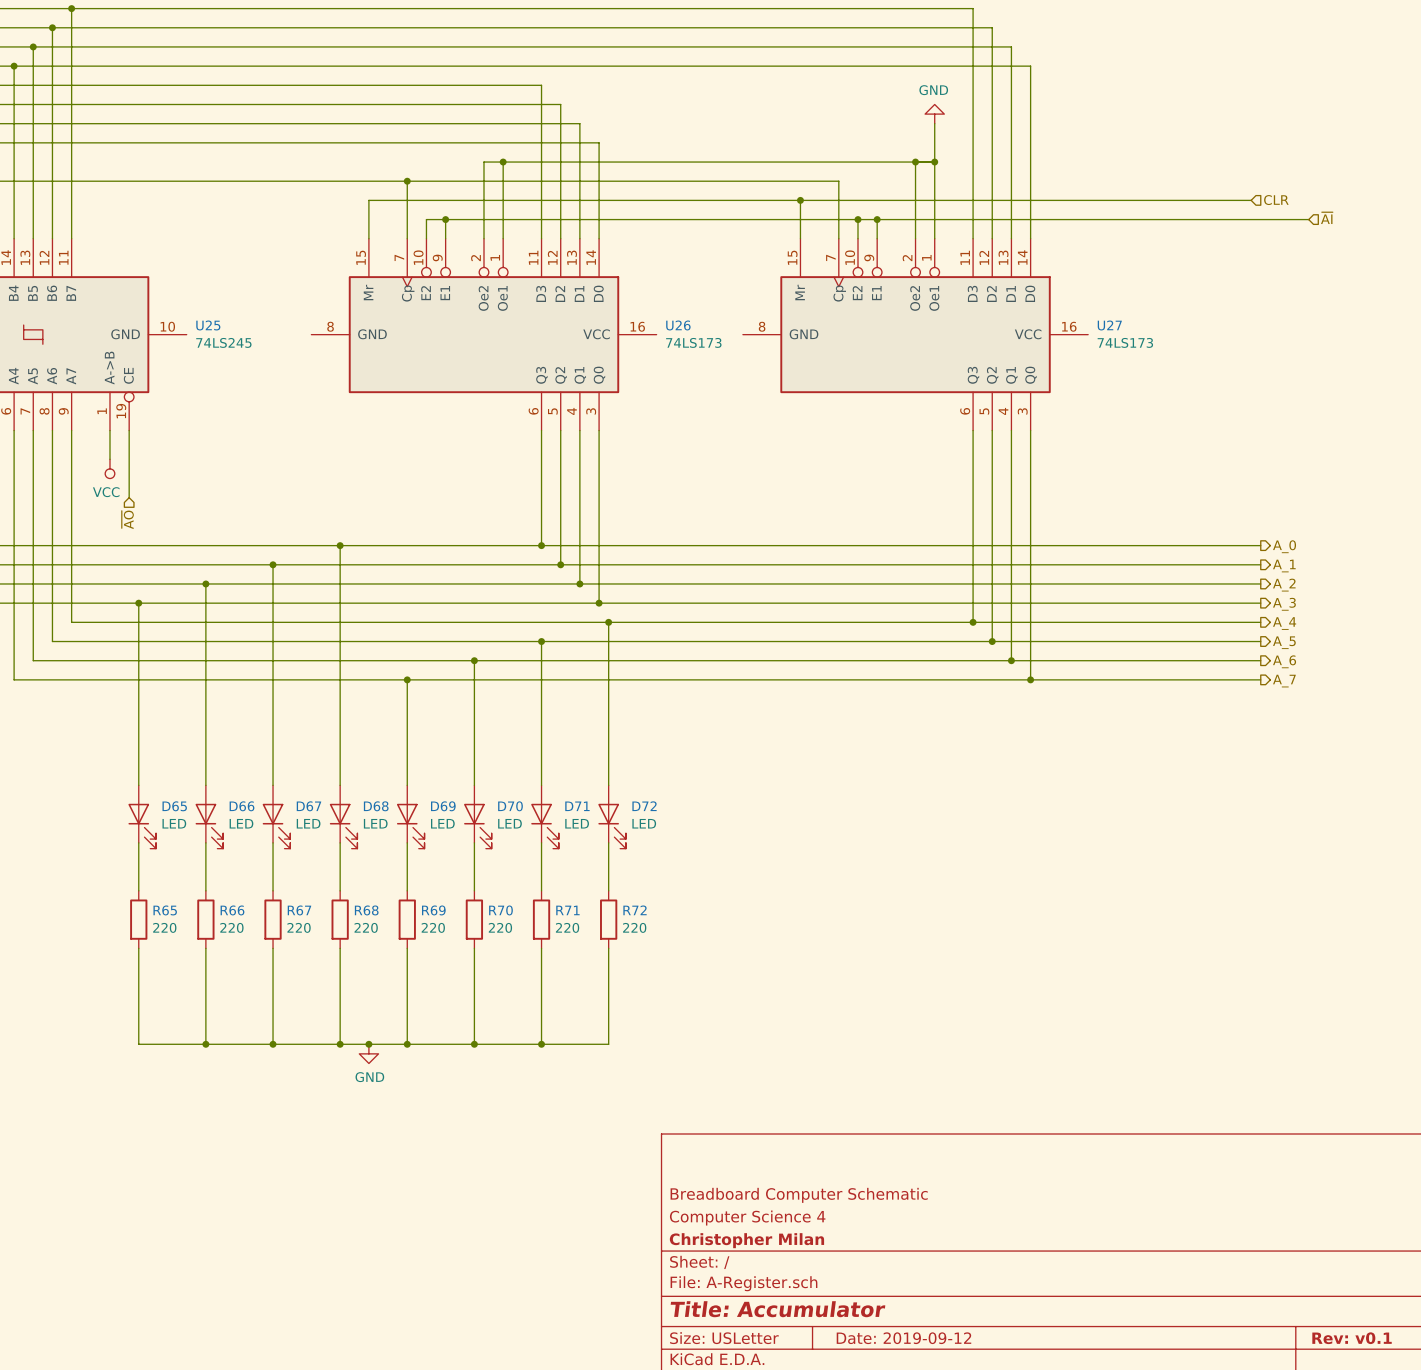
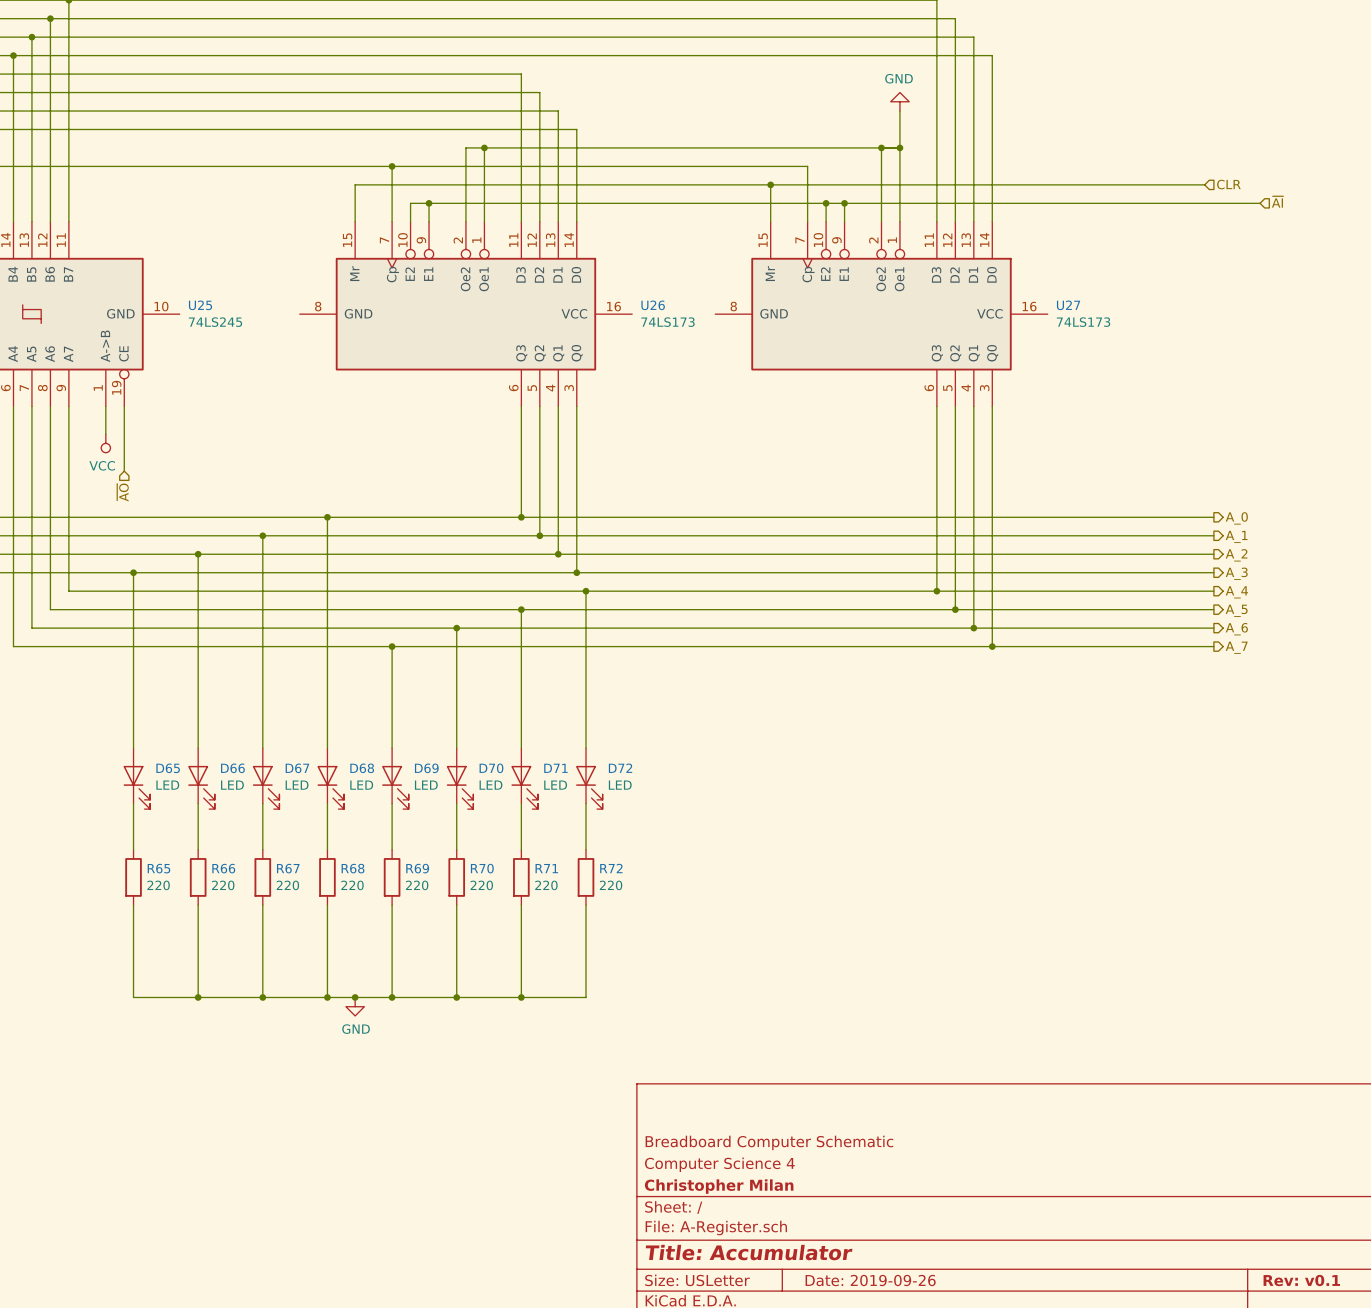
title block: Date: 2019-09-12 (903, 1338) -> Date: 2019-09-26 (870, 1280)

